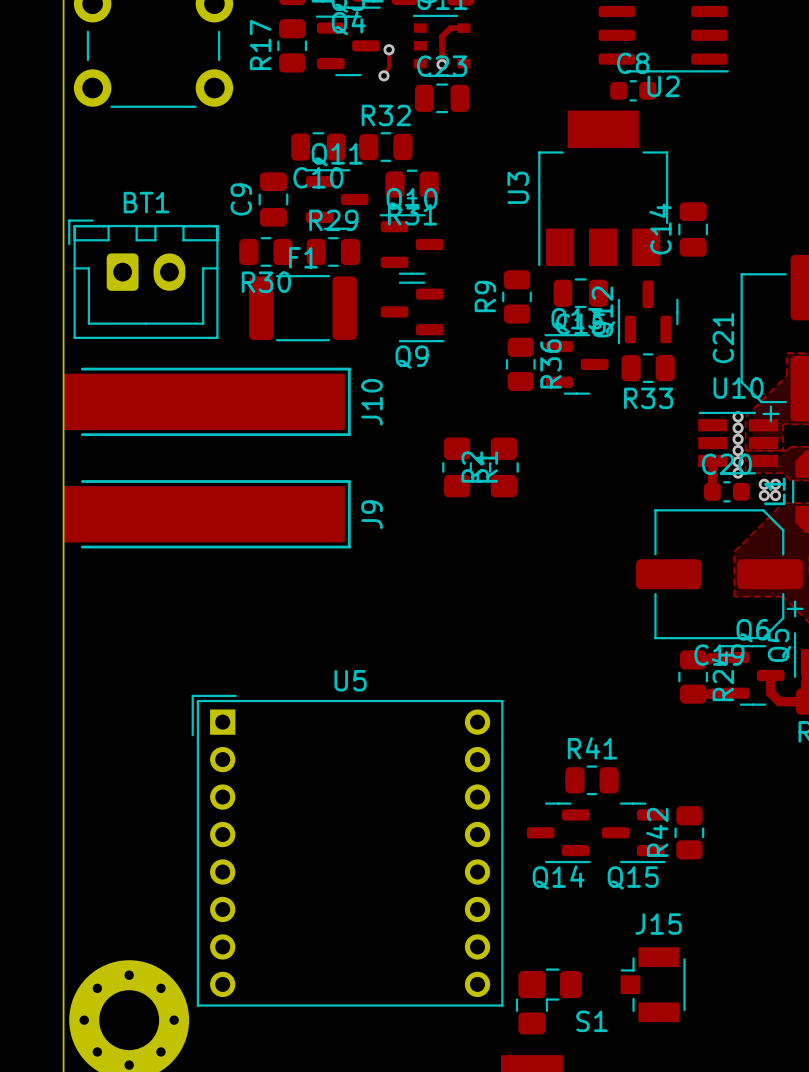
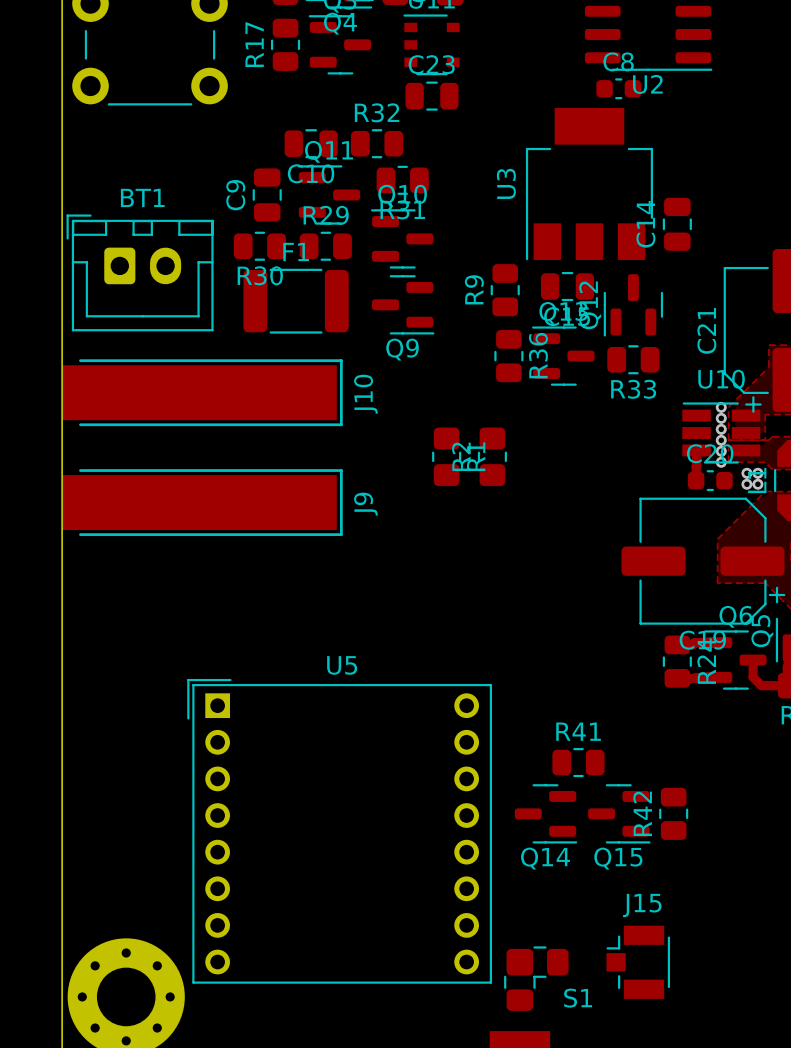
track: (463, 28) (450, 28) (442, 36) (442, 64) -> none
track: (389, 49) (389, 67) (383, 75) -> none
via: (389, 49) -> none
via: (442, 64) -> none
via: (383, 75) -> none

